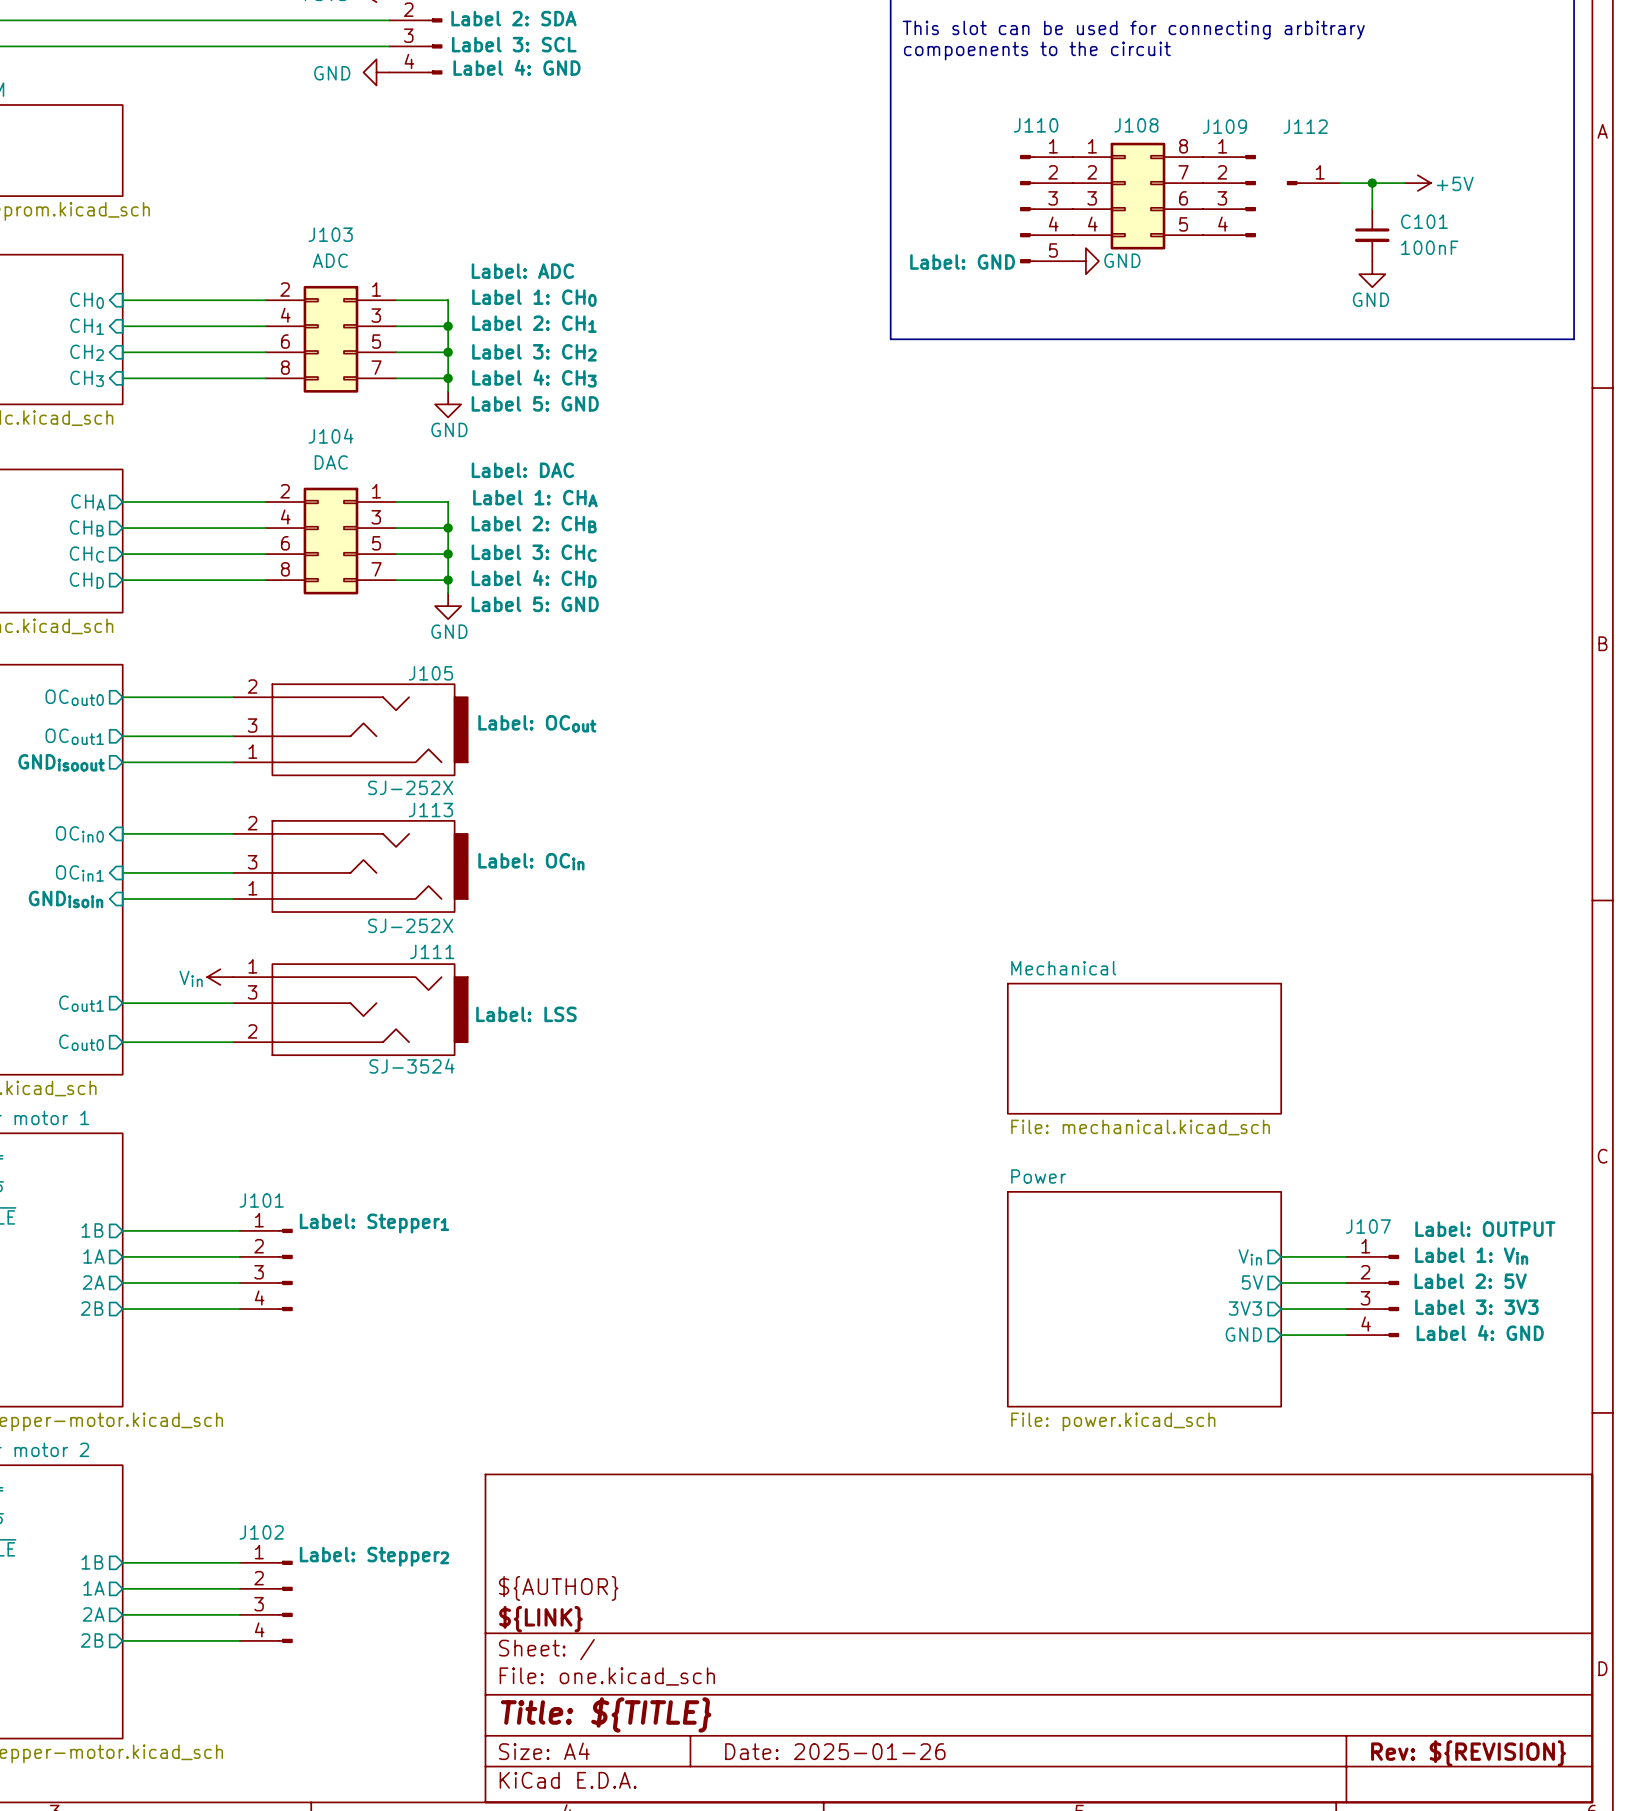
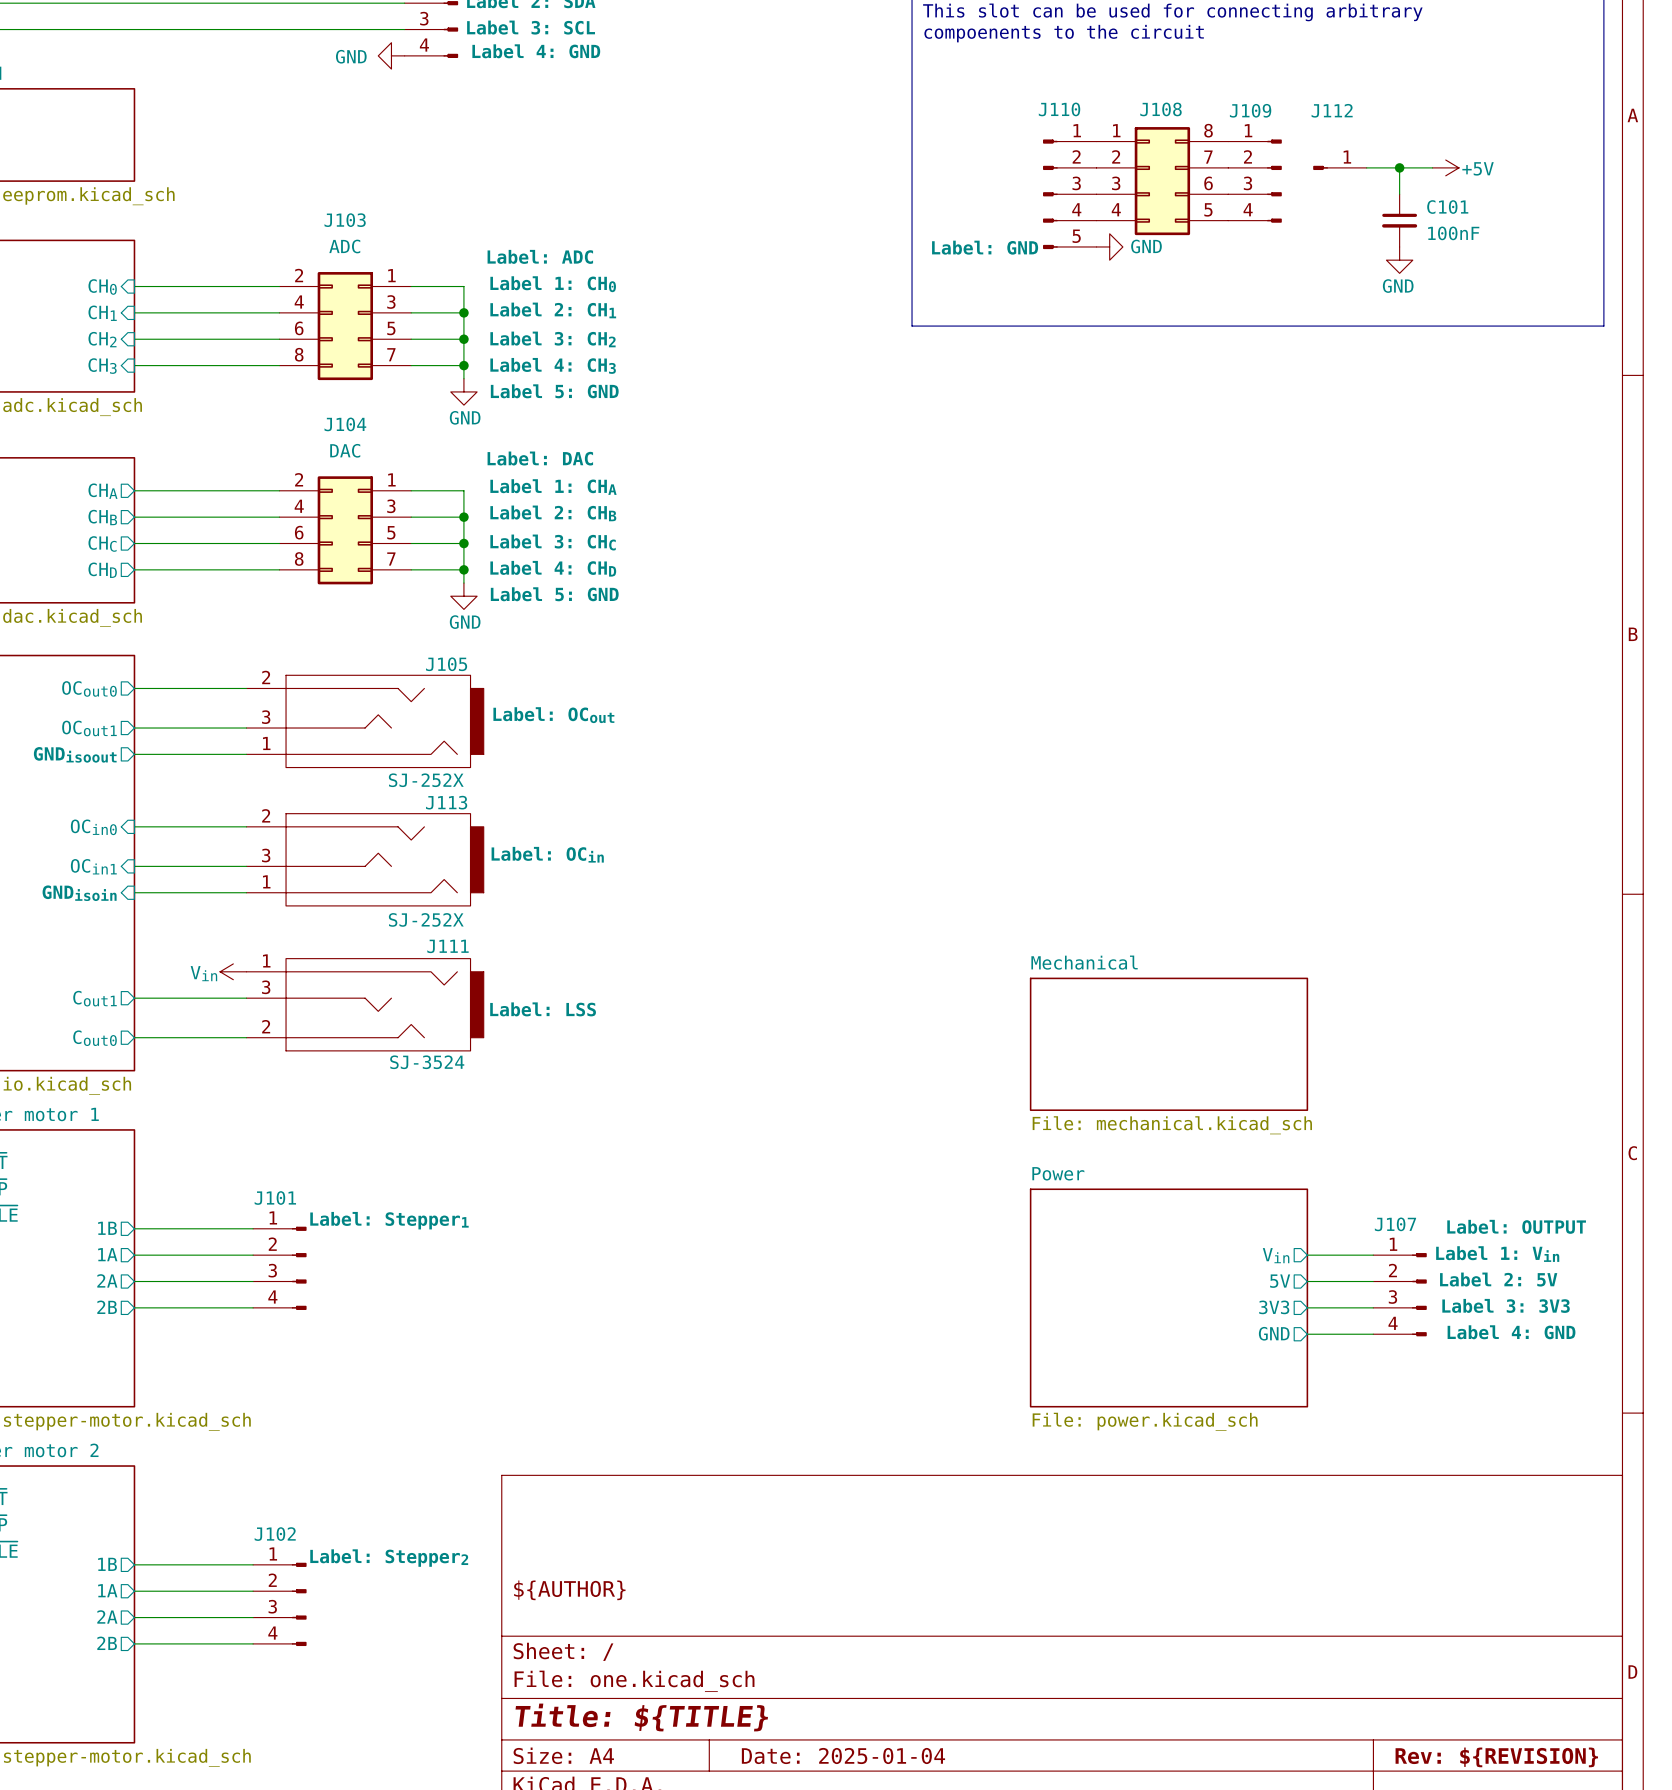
title block: ${LINK} (540, 1619) -> none
title block: Date: 2025-01-26 (835, 1751) -> Date: 2025-01-04 (843, 1755)

